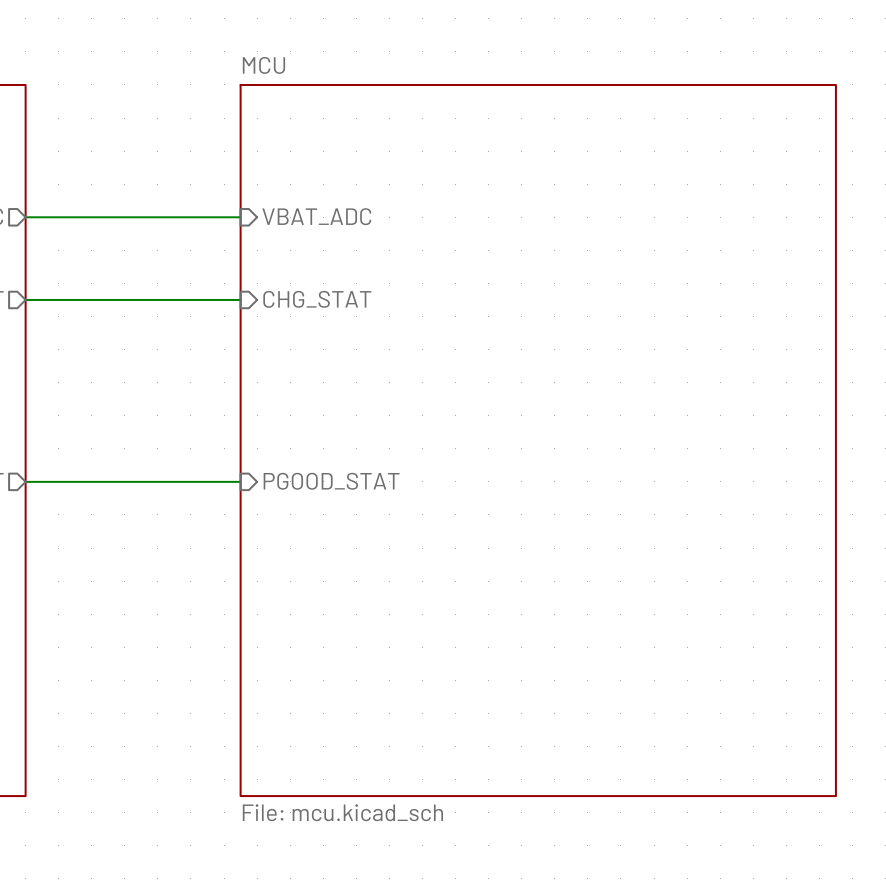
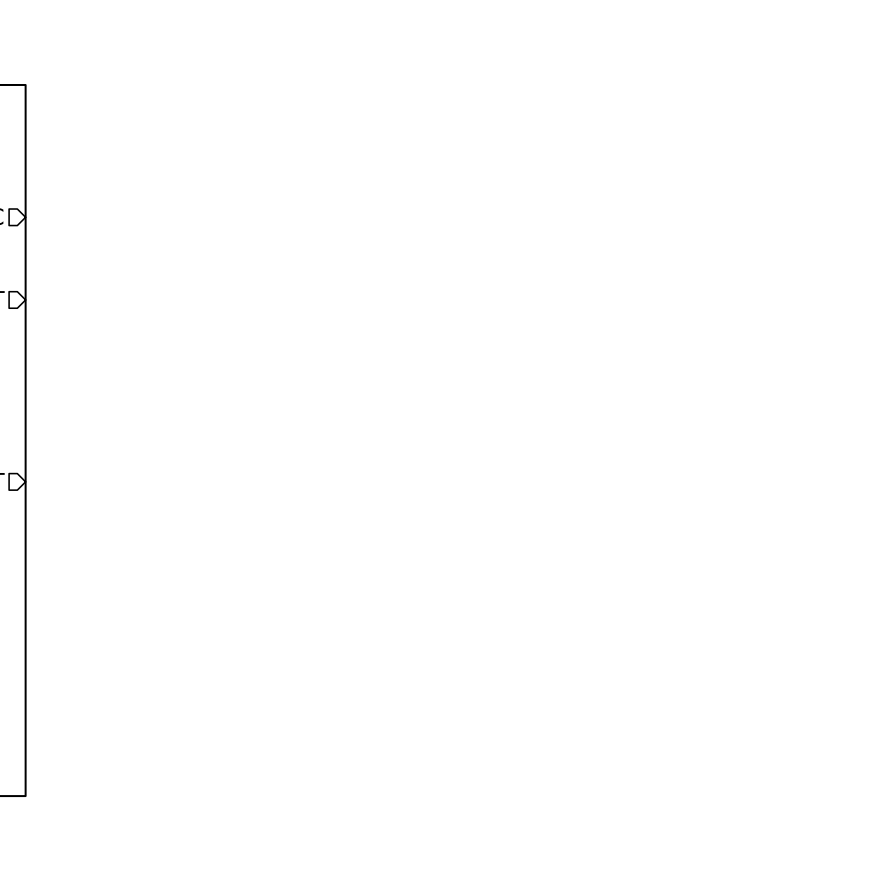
sheet pin: VBAT_ADC (316, 216) -> none
wire: (25, 217) (240, 217) -> none
wire: (25, 299) (240, 299) -> none
sheet pin: CHG_STAT (317, 299) -> none
sheet MCU: File: mcu.kicad_sch (538, 440) -> none
wire: (25, 481) (240, 481) -> none
sheet pin: PGOOD_STAT (331, 481) -> none

